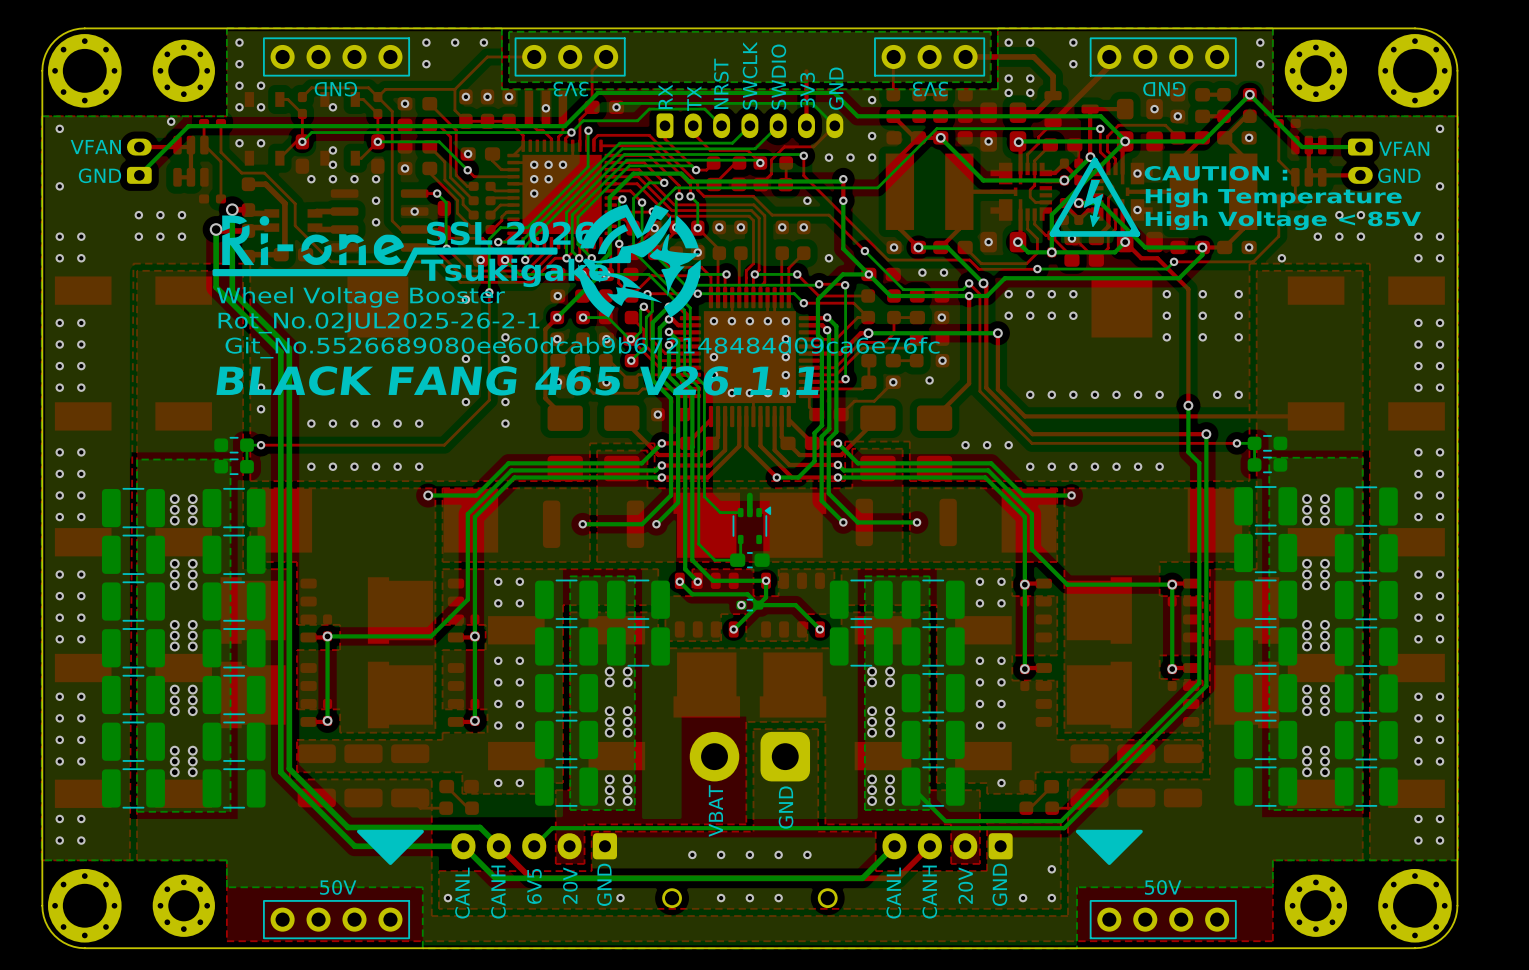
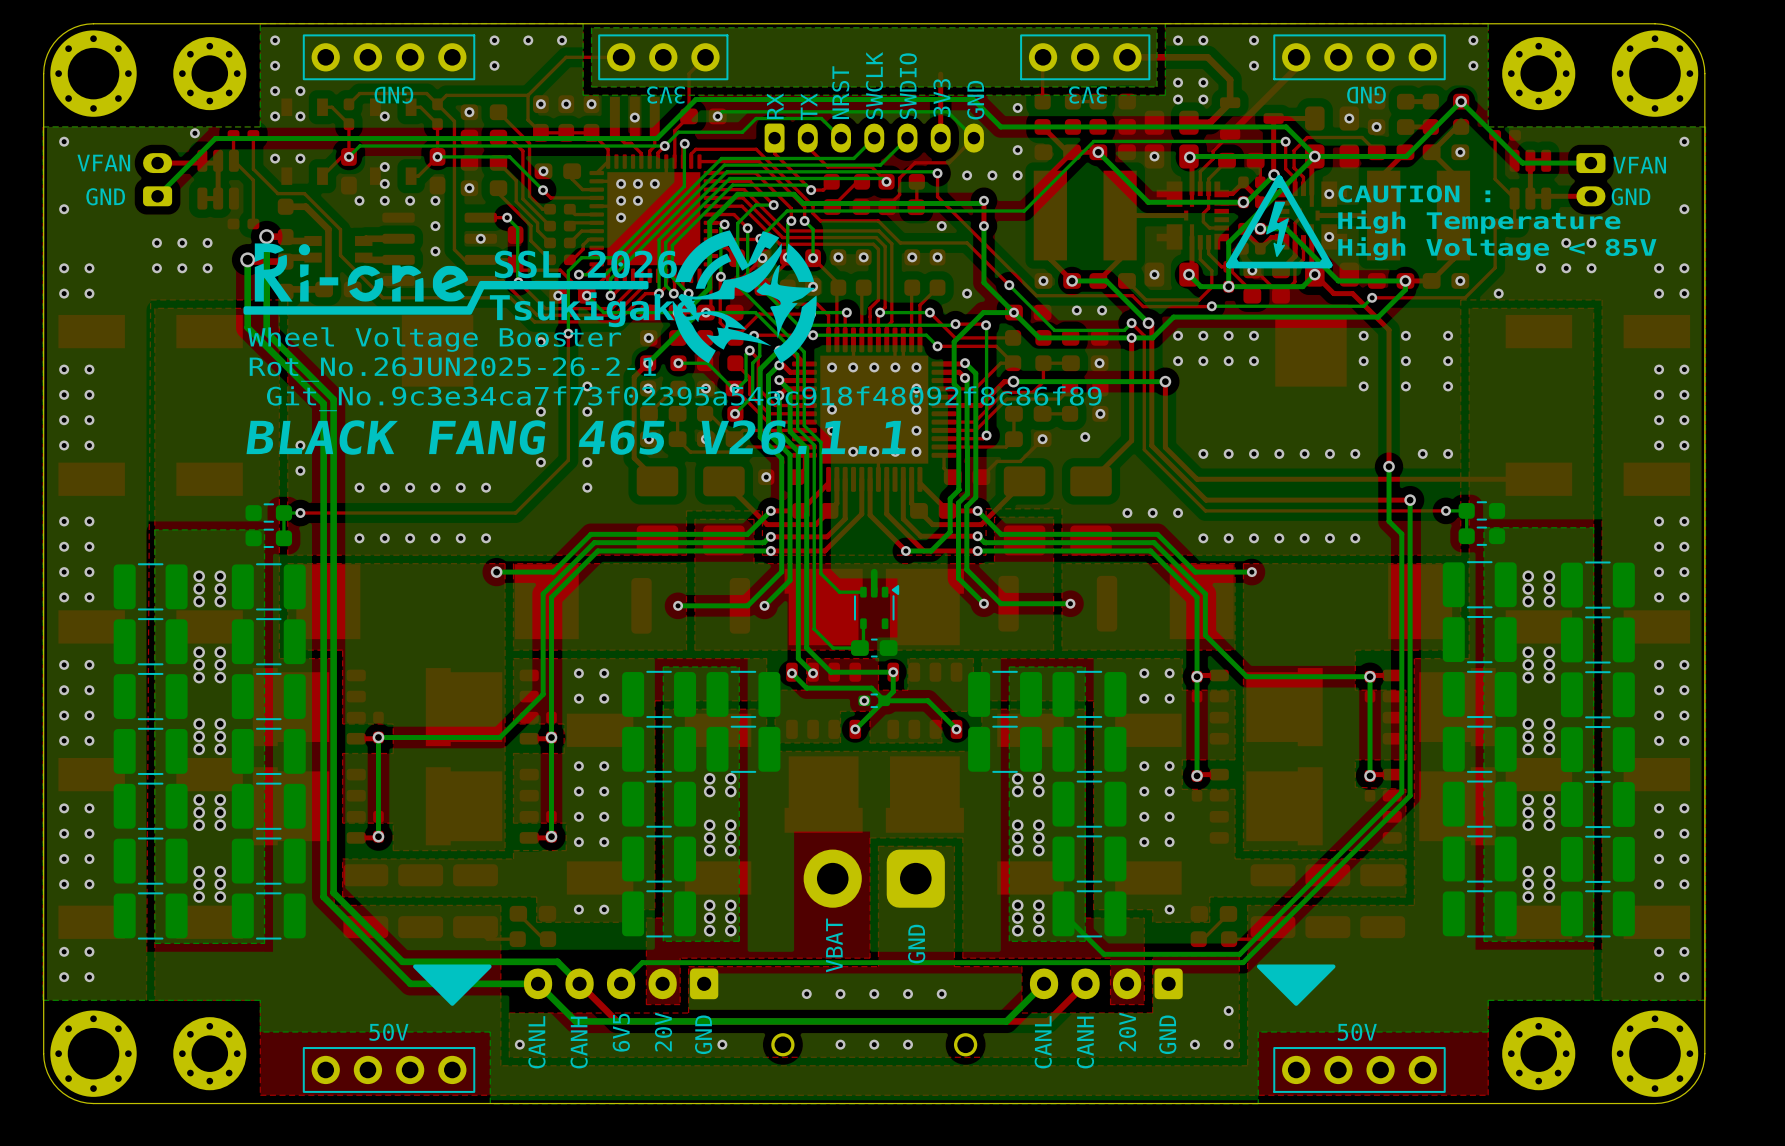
text: Rot_No.02JUL2025-26-2-1 (379, 322) -> Rot_No.26JUN2025-26-2-1 (452, 369)
text: Git_No.5526689080ee60dcab9b672148484d09ca6e76fc (582, 347) -> Git_No.9c3e34ca7f73f02395a54ac918f48092f8c86f89 (684, 398)

